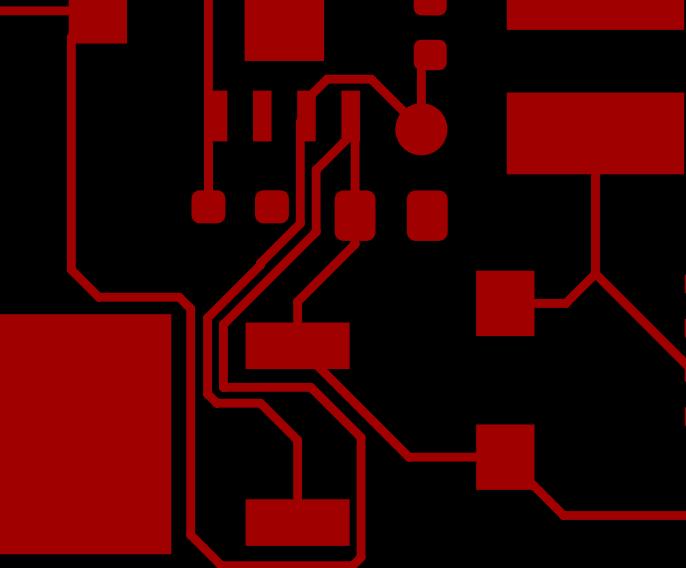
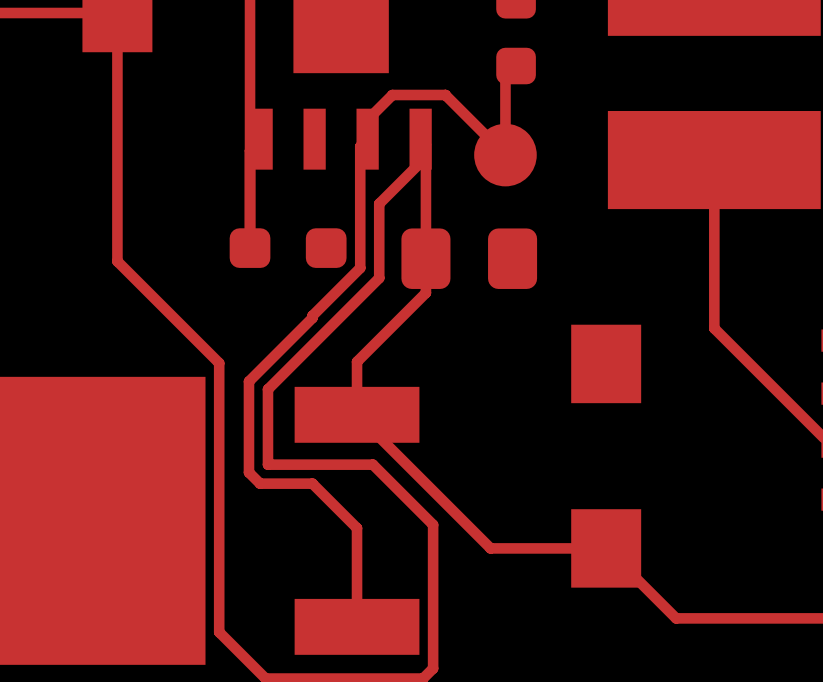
top track: (97, 10) (71, 37) (71, 269) (98, 297) (179, 297) (190, 308) (190, 534) -> (117, 13) (117, 261) (219, 363) (219, 632) (228, 641)
top track: (595, 273) (565, 303) (505, 303) -> none

